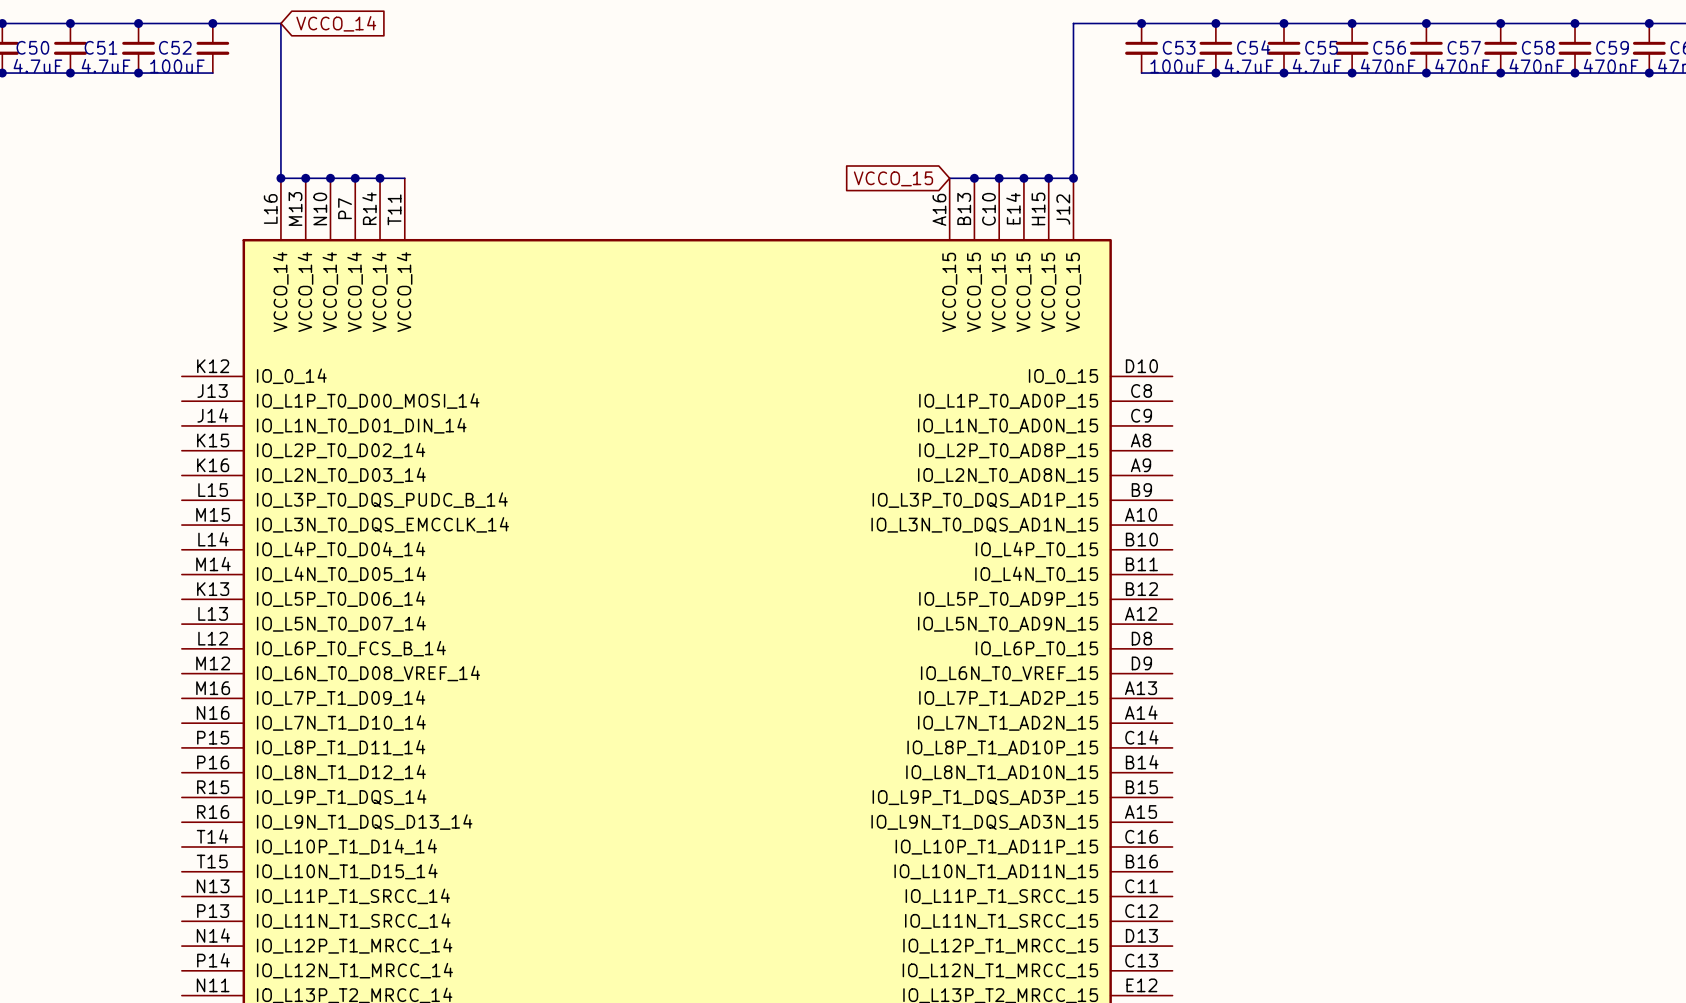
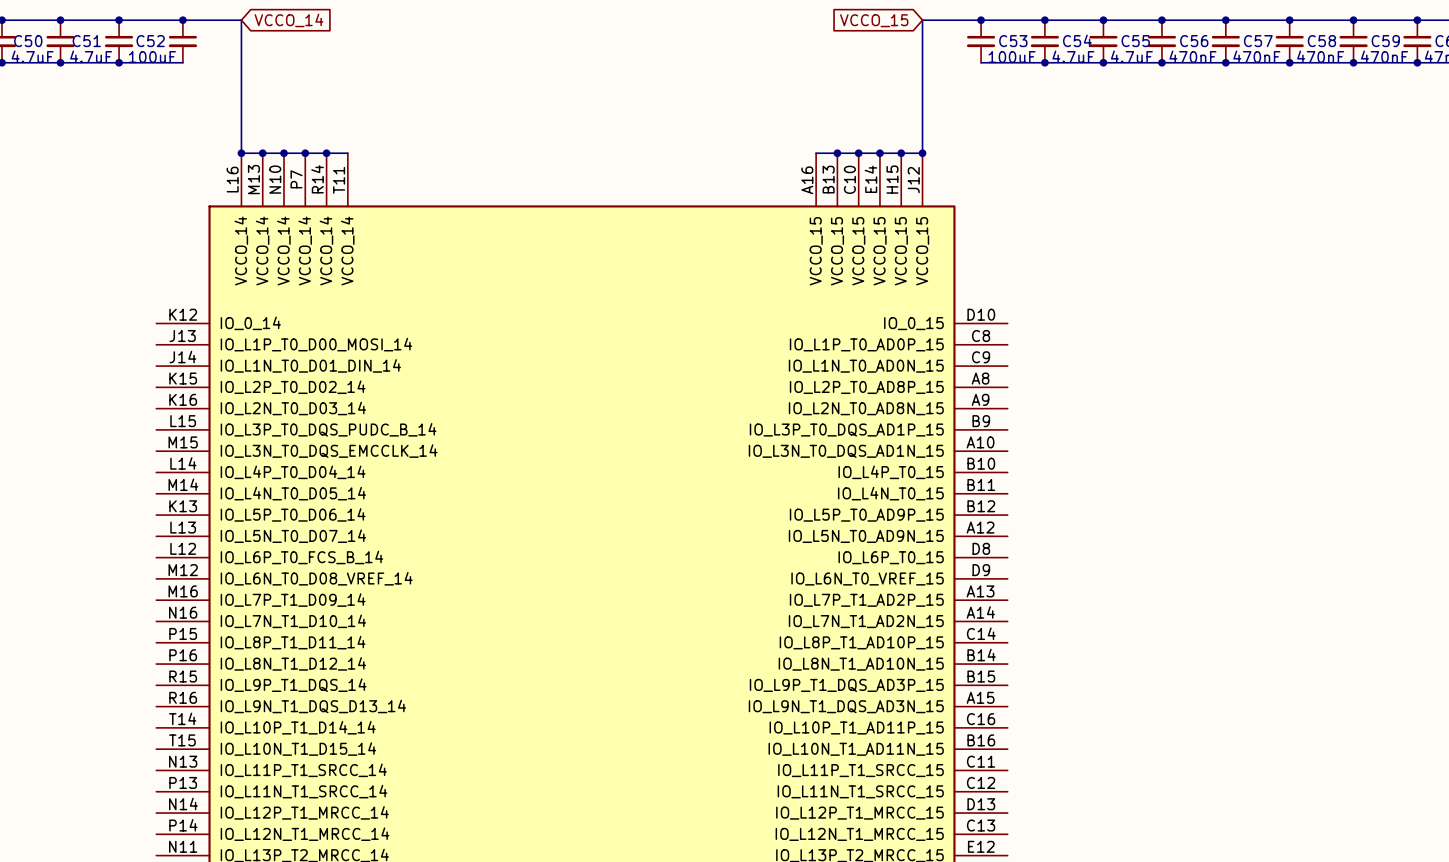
global label position: VCCO_15 (893, 178) -> VCCO_15 (874, 20)

